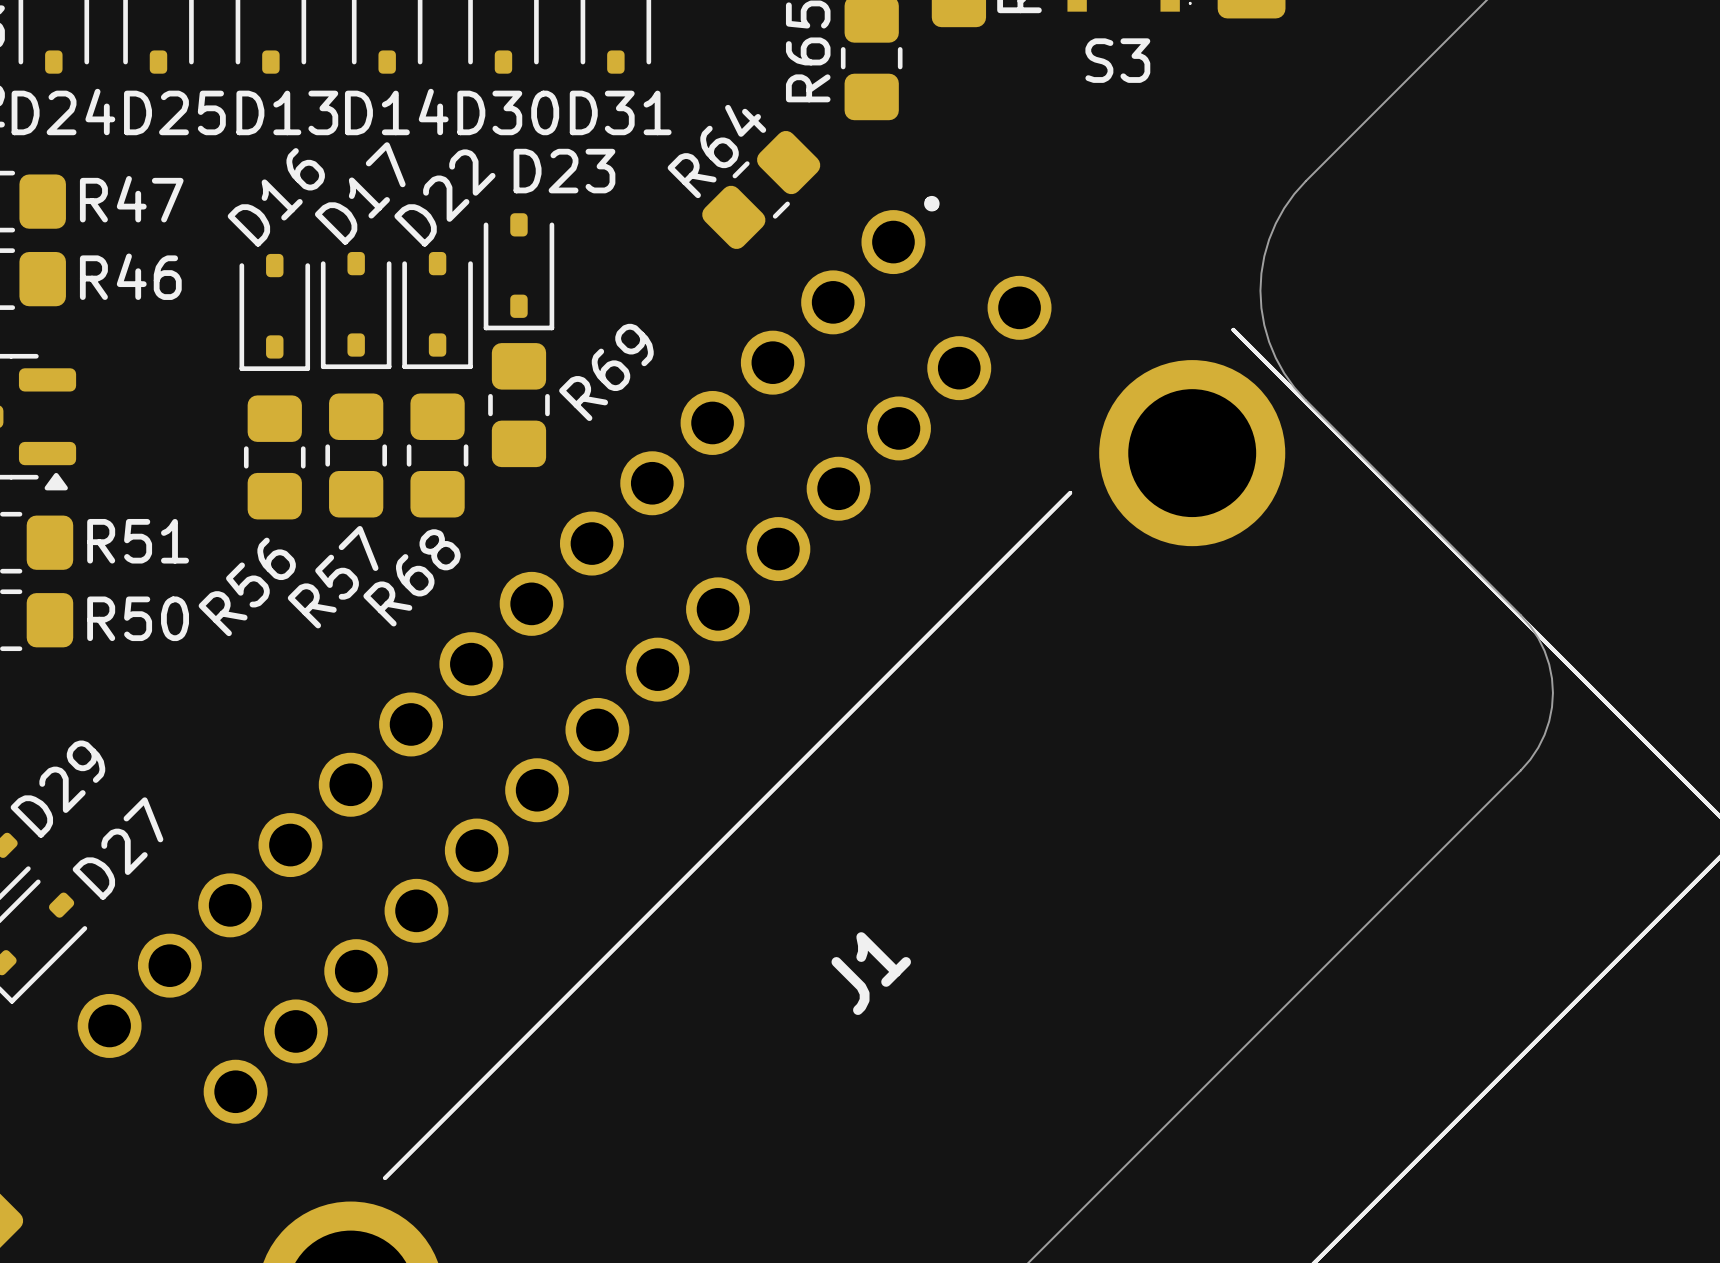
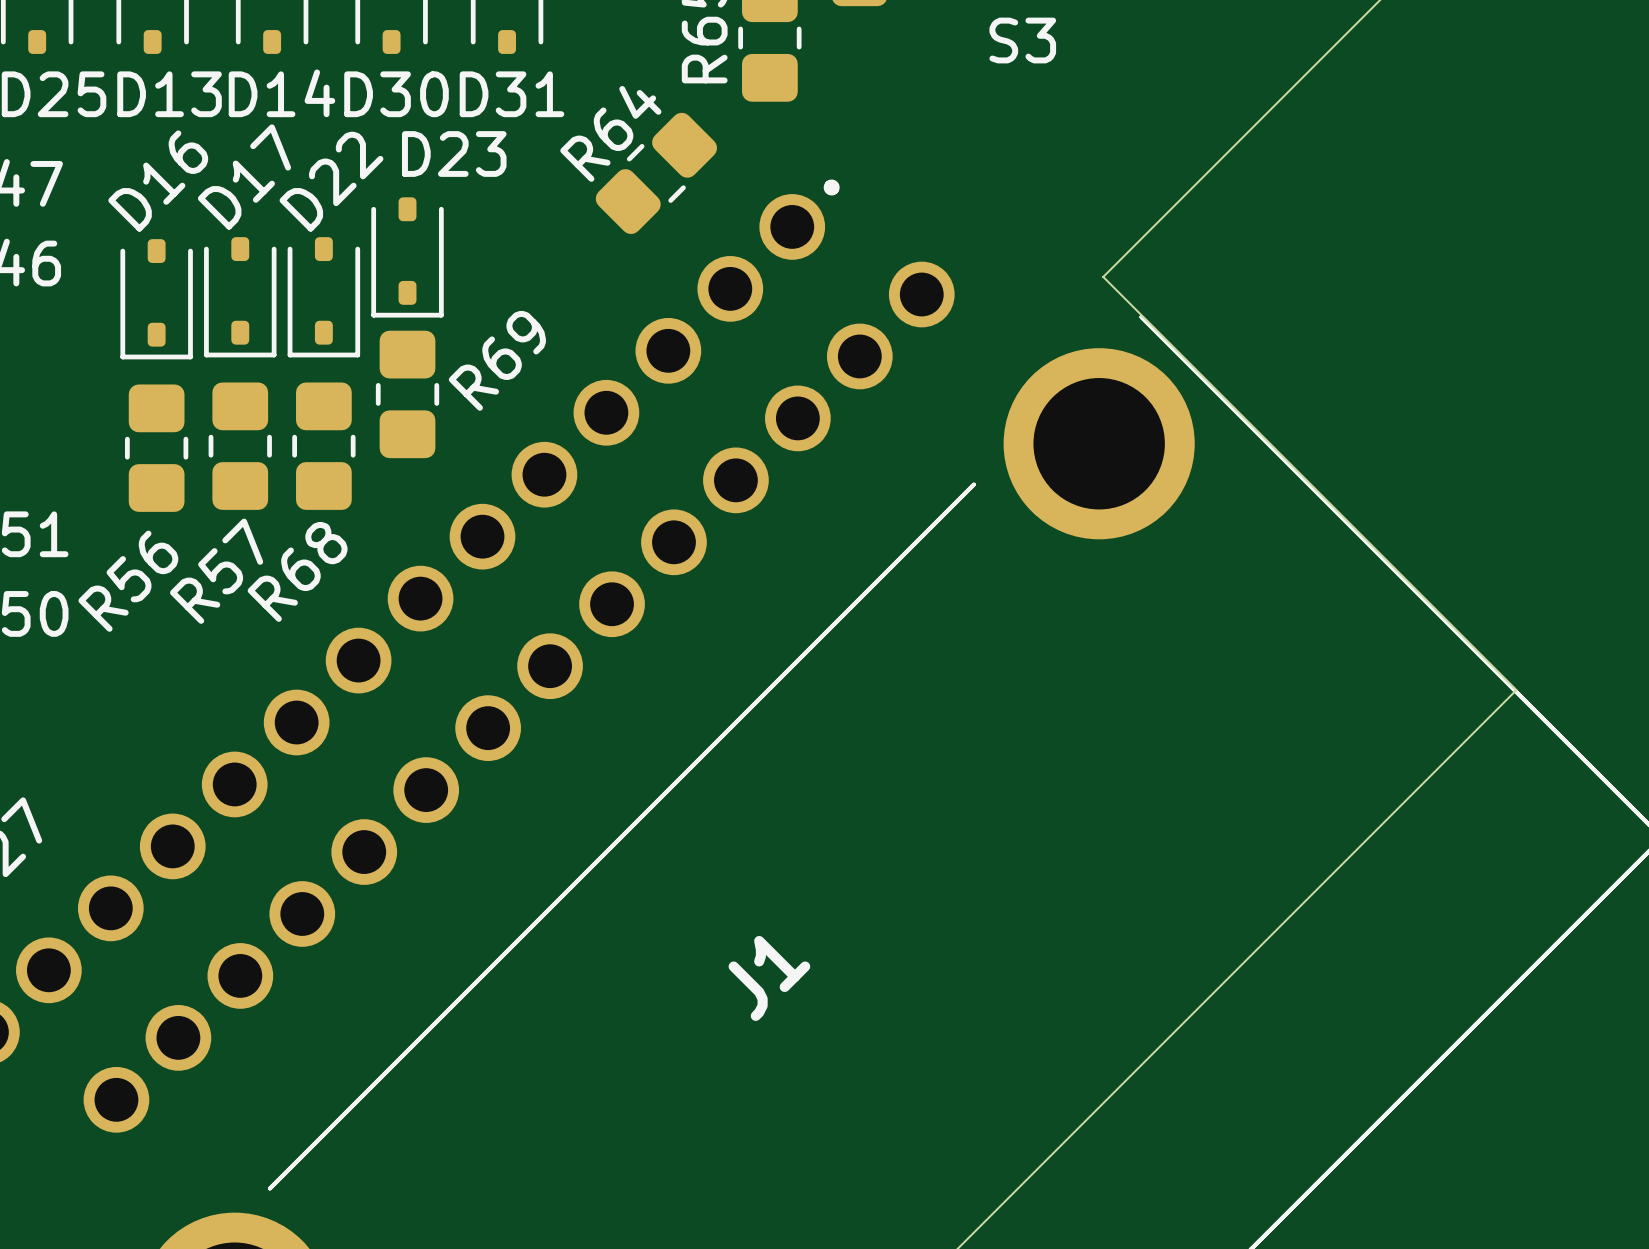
board edge: (1305, 181) (1284, 208) (1269, 239) (1261, 273) (1260, 290) (1264, 325) (1269, 341) (1284, 373) (1305, 400) -> (1215, 164) (1103, 276) (1215, 389)
board edge: (1520, 615) (1538, 638) (1544, 650) (1552, 678) (1552, 692) (1552, 707) (1544, 734) (1538, 747) (1520, 770) -> (1436, 610) (1516, 690) (1436, 769)

